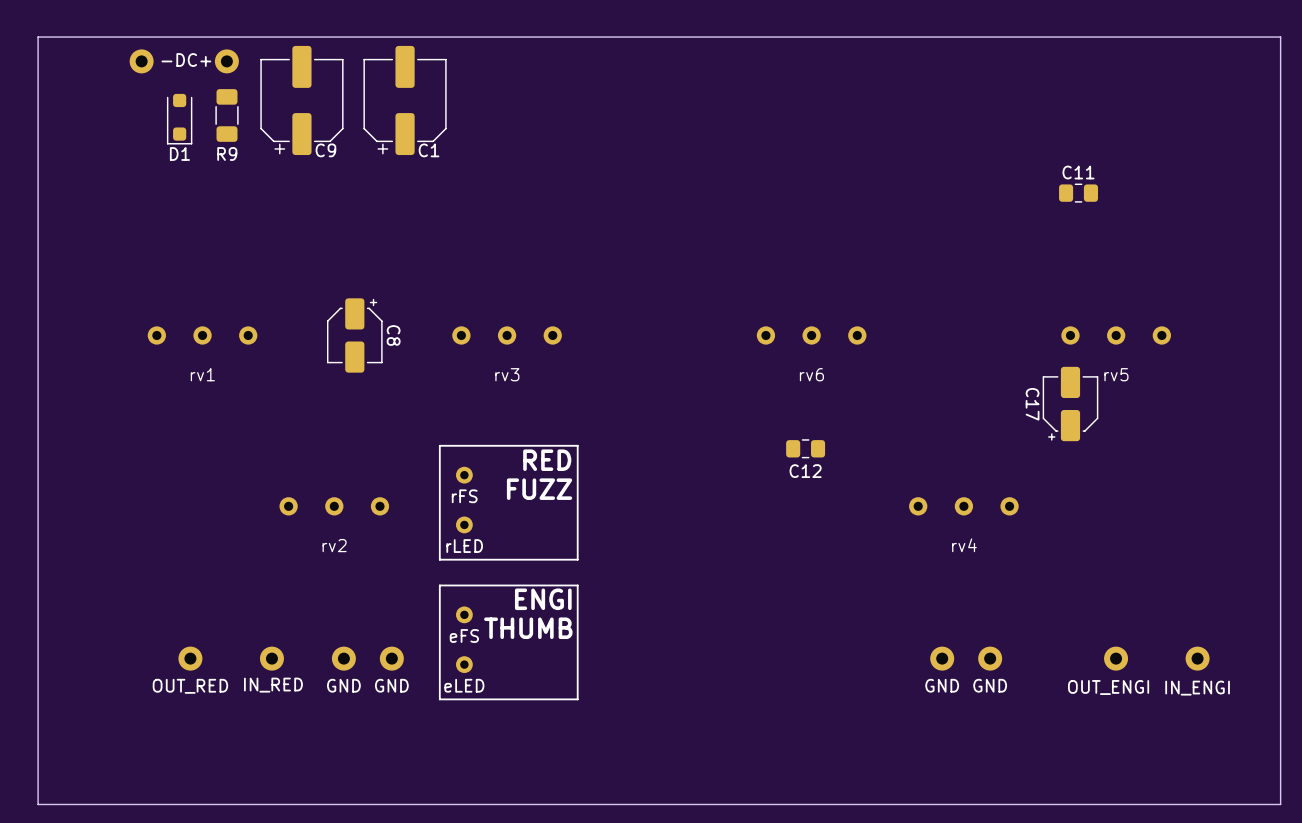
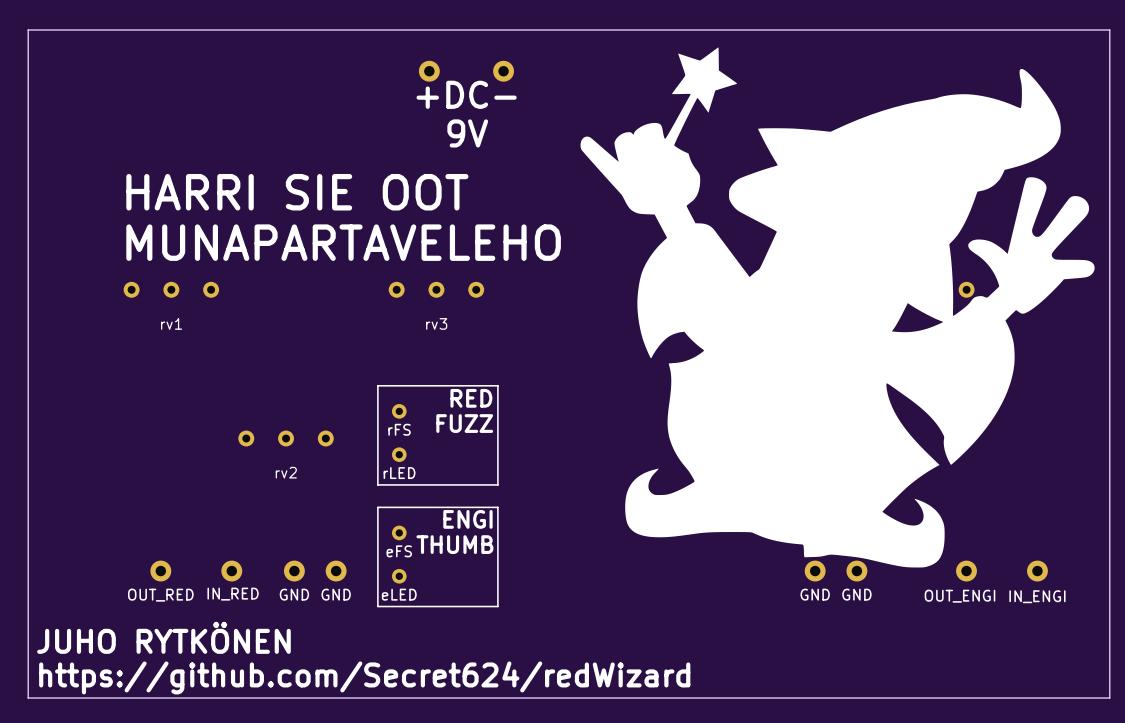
drawing: none -> [580, 47, 1095, 568]
text: -DC+ (186, 60) -> none
part: (141, 61) -> none
part: (226, 61) -> none
part: none -> (429, 71)
part: none -> (503, 71)
C9: (301, 100) -> none
C1: (405, 100) -> none
text: none -> +DC- (466, 94)
R9: (227, 115) -> none
D1: (179, 119) -> none
text: none -> 9V (467, 133)
C11: (1078, 193) -> none
text: none -> HARRI SIE OOT (297, 192)
text: none -> MUNAPARTAVELEHO (343, 242)
C8: (354, 335) -> none
C17: (1070, 404) -> none
C12: (805, 448) -> none
text: none -> JUHO RYTKÖNEN (163, 637)
text: none -> https://github.com/Secret624/redWizard (364, 677)

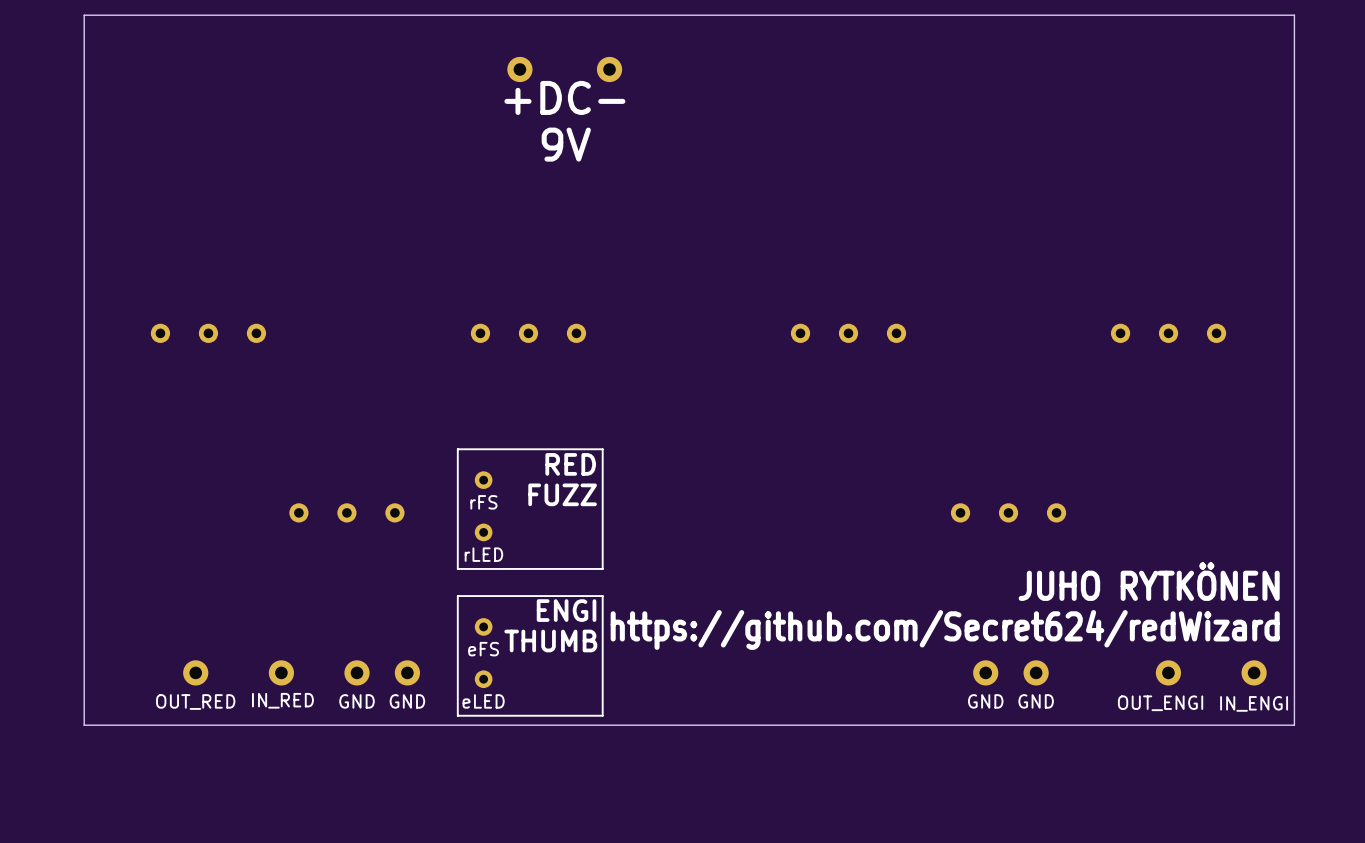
board edge: (1109, 30) (28, 30) (28, 698) (1109, 698) (1109, 30) -> (1294, 15) (1294, 725) (84, 725) (84, 15) (1294, 15)
drawing: [580, 47, 1095, 568] -> none
text: HARRI SIE OOT (297, 192) -> none
text: MUNAPARTAVELEHO (343, 242) -> none
rv1 name: rv1 (171, 323) -> none
rv3 name: rv3 (436, 323) -> none
rv2 name: rv2 (286, 472) -> none
text: none -> JUHO RYTKÖNEN (1149, 581)
text: none -> https://github.com/Secret624/redWizard (945, 629)
text: JUHO RYTKÖNEN (163, 637) -> none
text: https://github.com/Secret624/redWizard (364, 677) -> none

